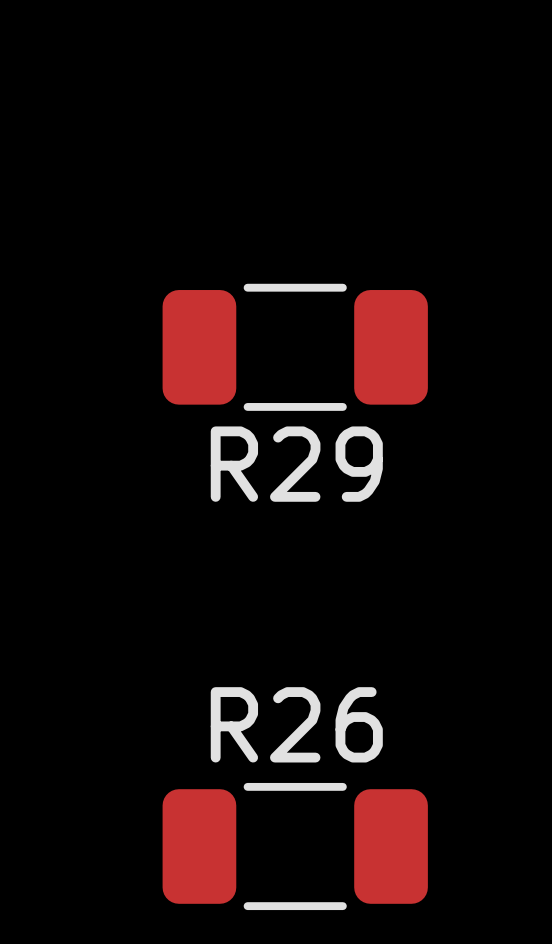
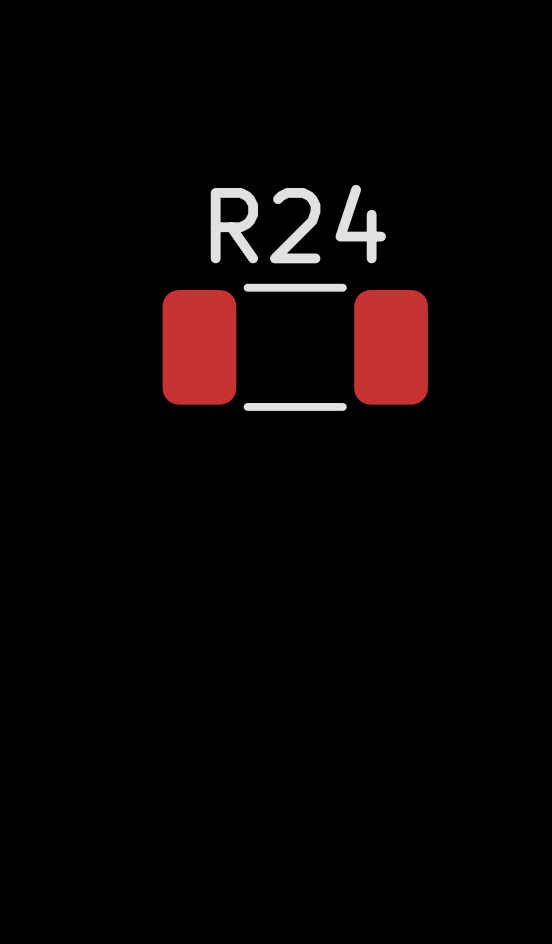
R29 name: R29 (296, 464) -> R24 (298, 224)
R26: (295, 846) -> none

